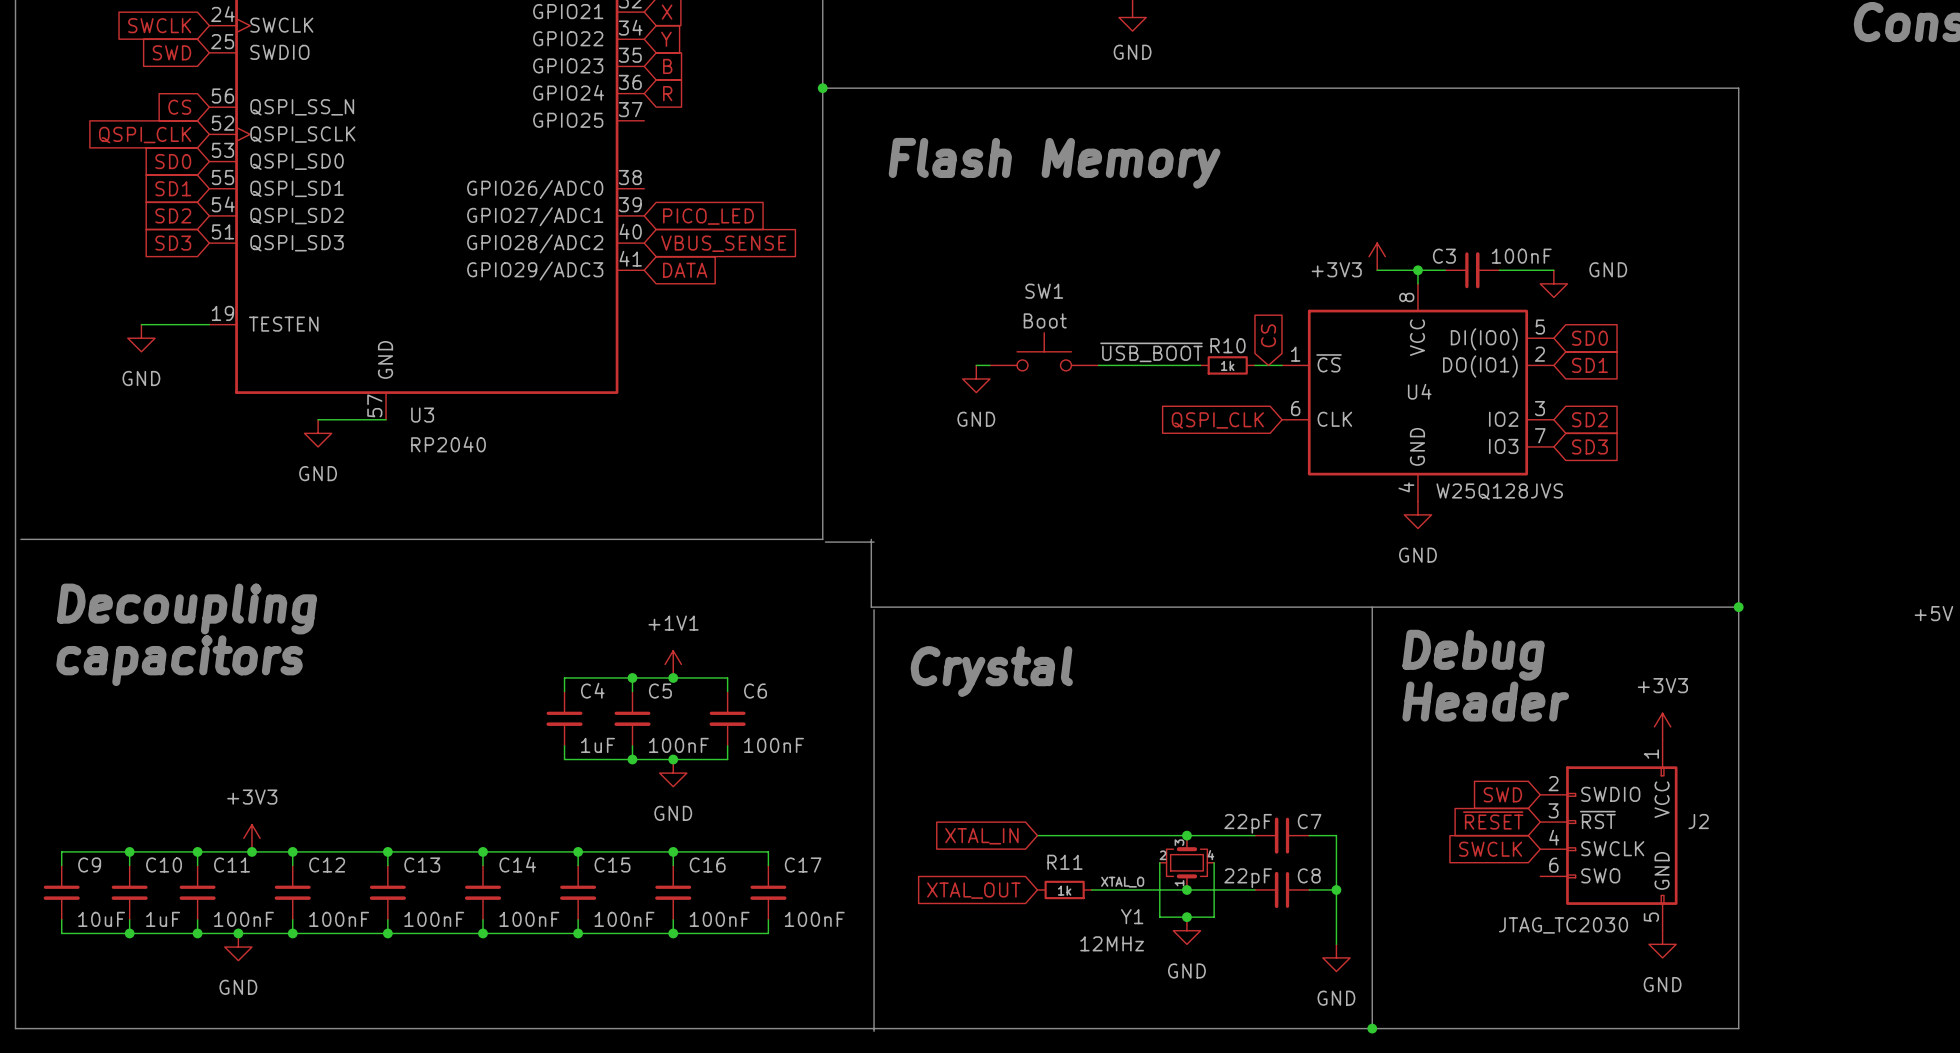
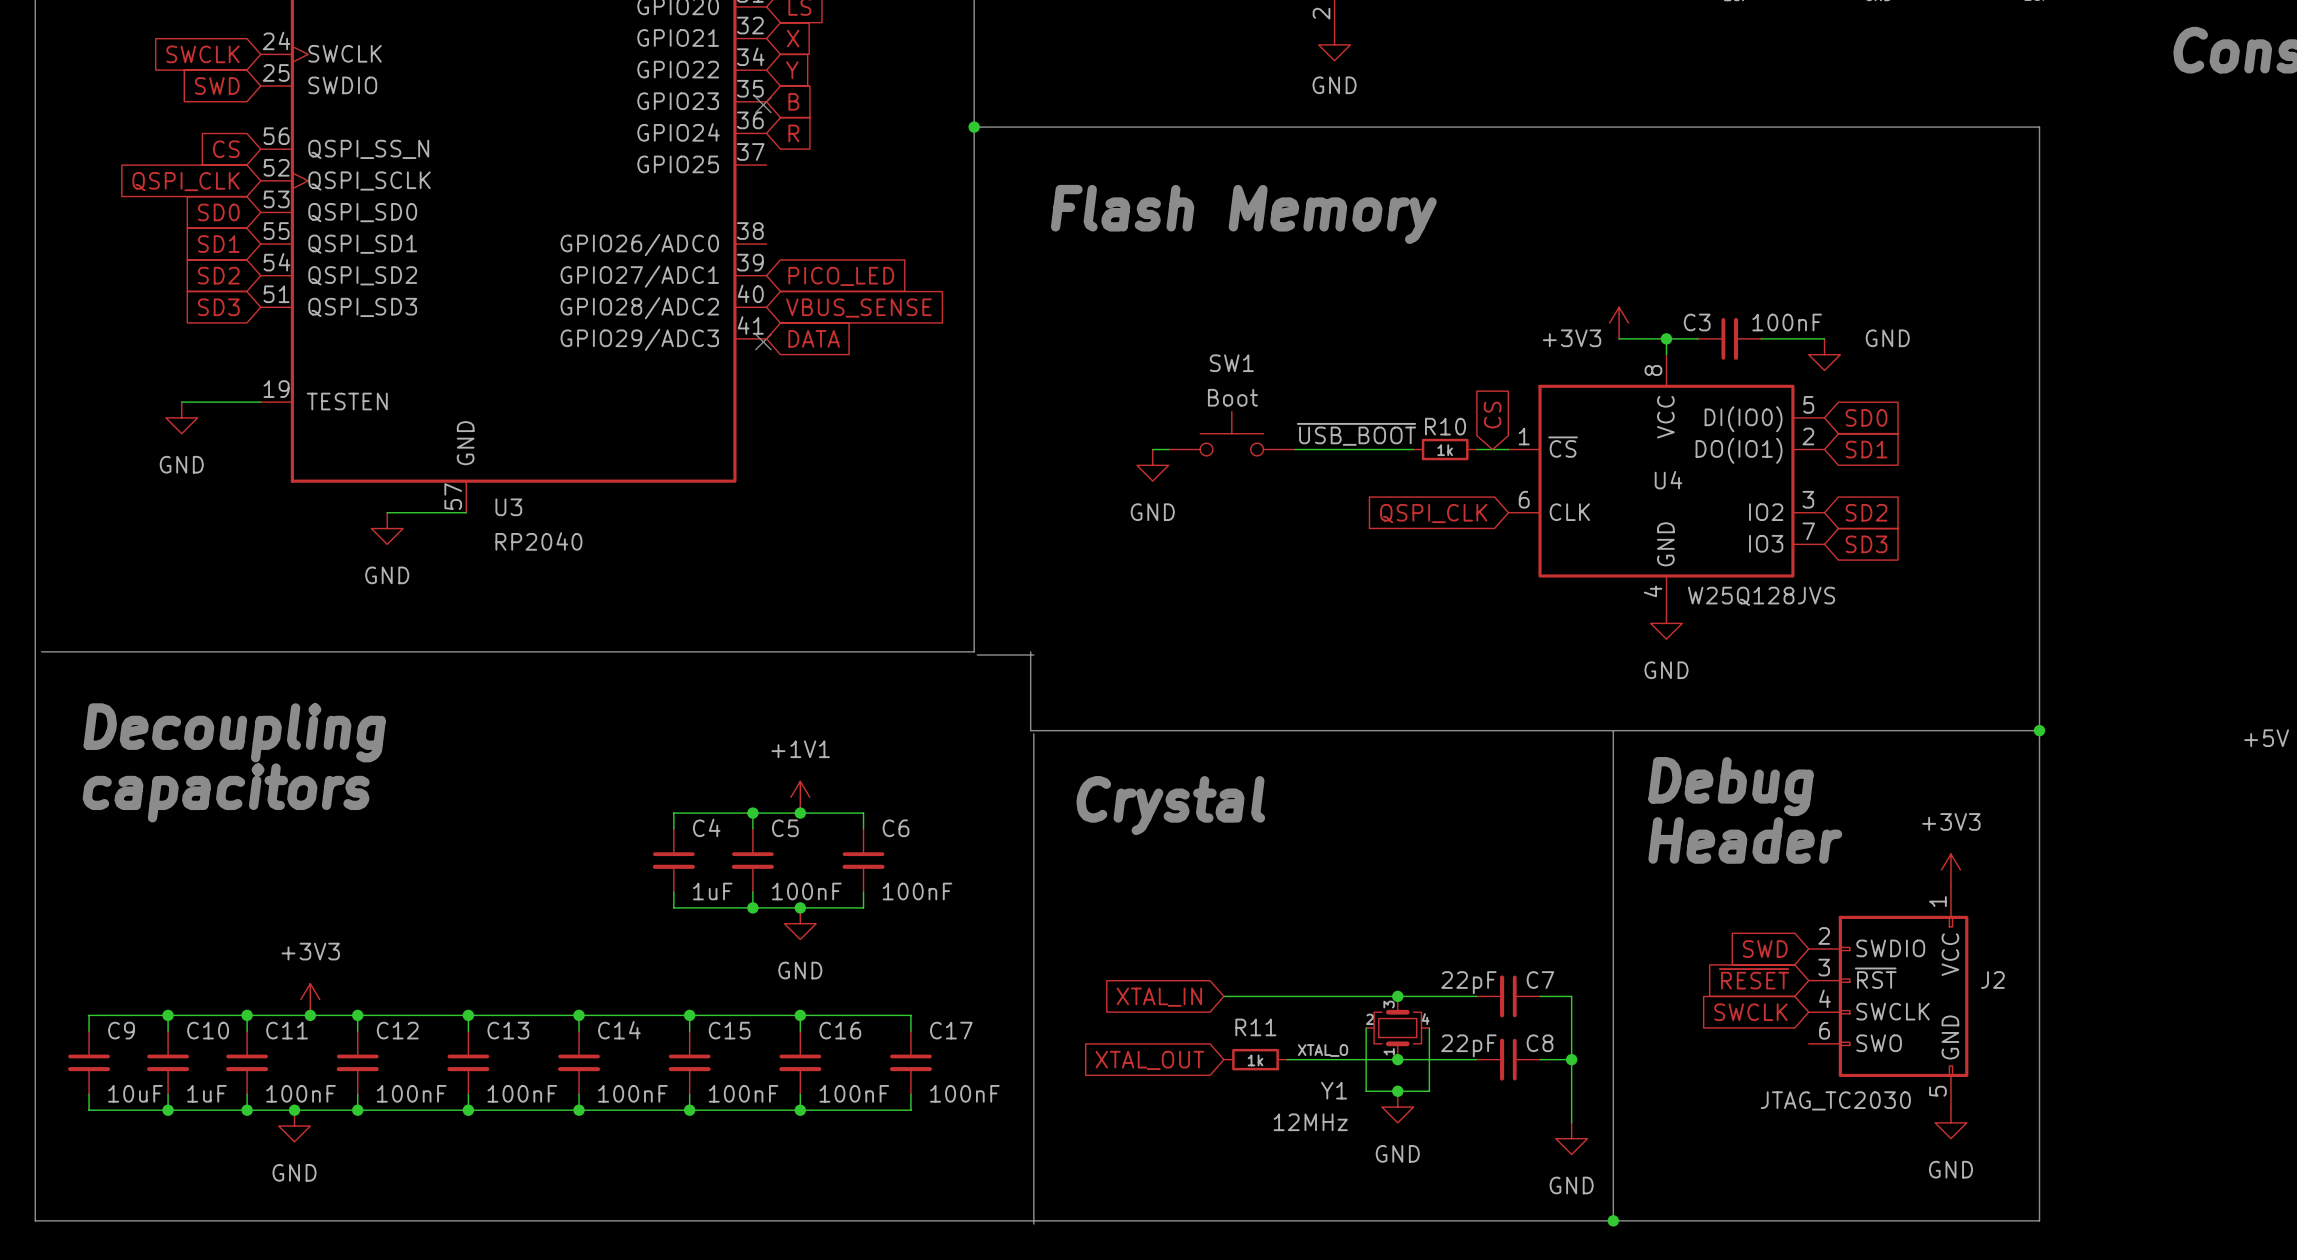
no-connect mark: none -> (763, 104)
no-connect mark: none -> (763, 342)

